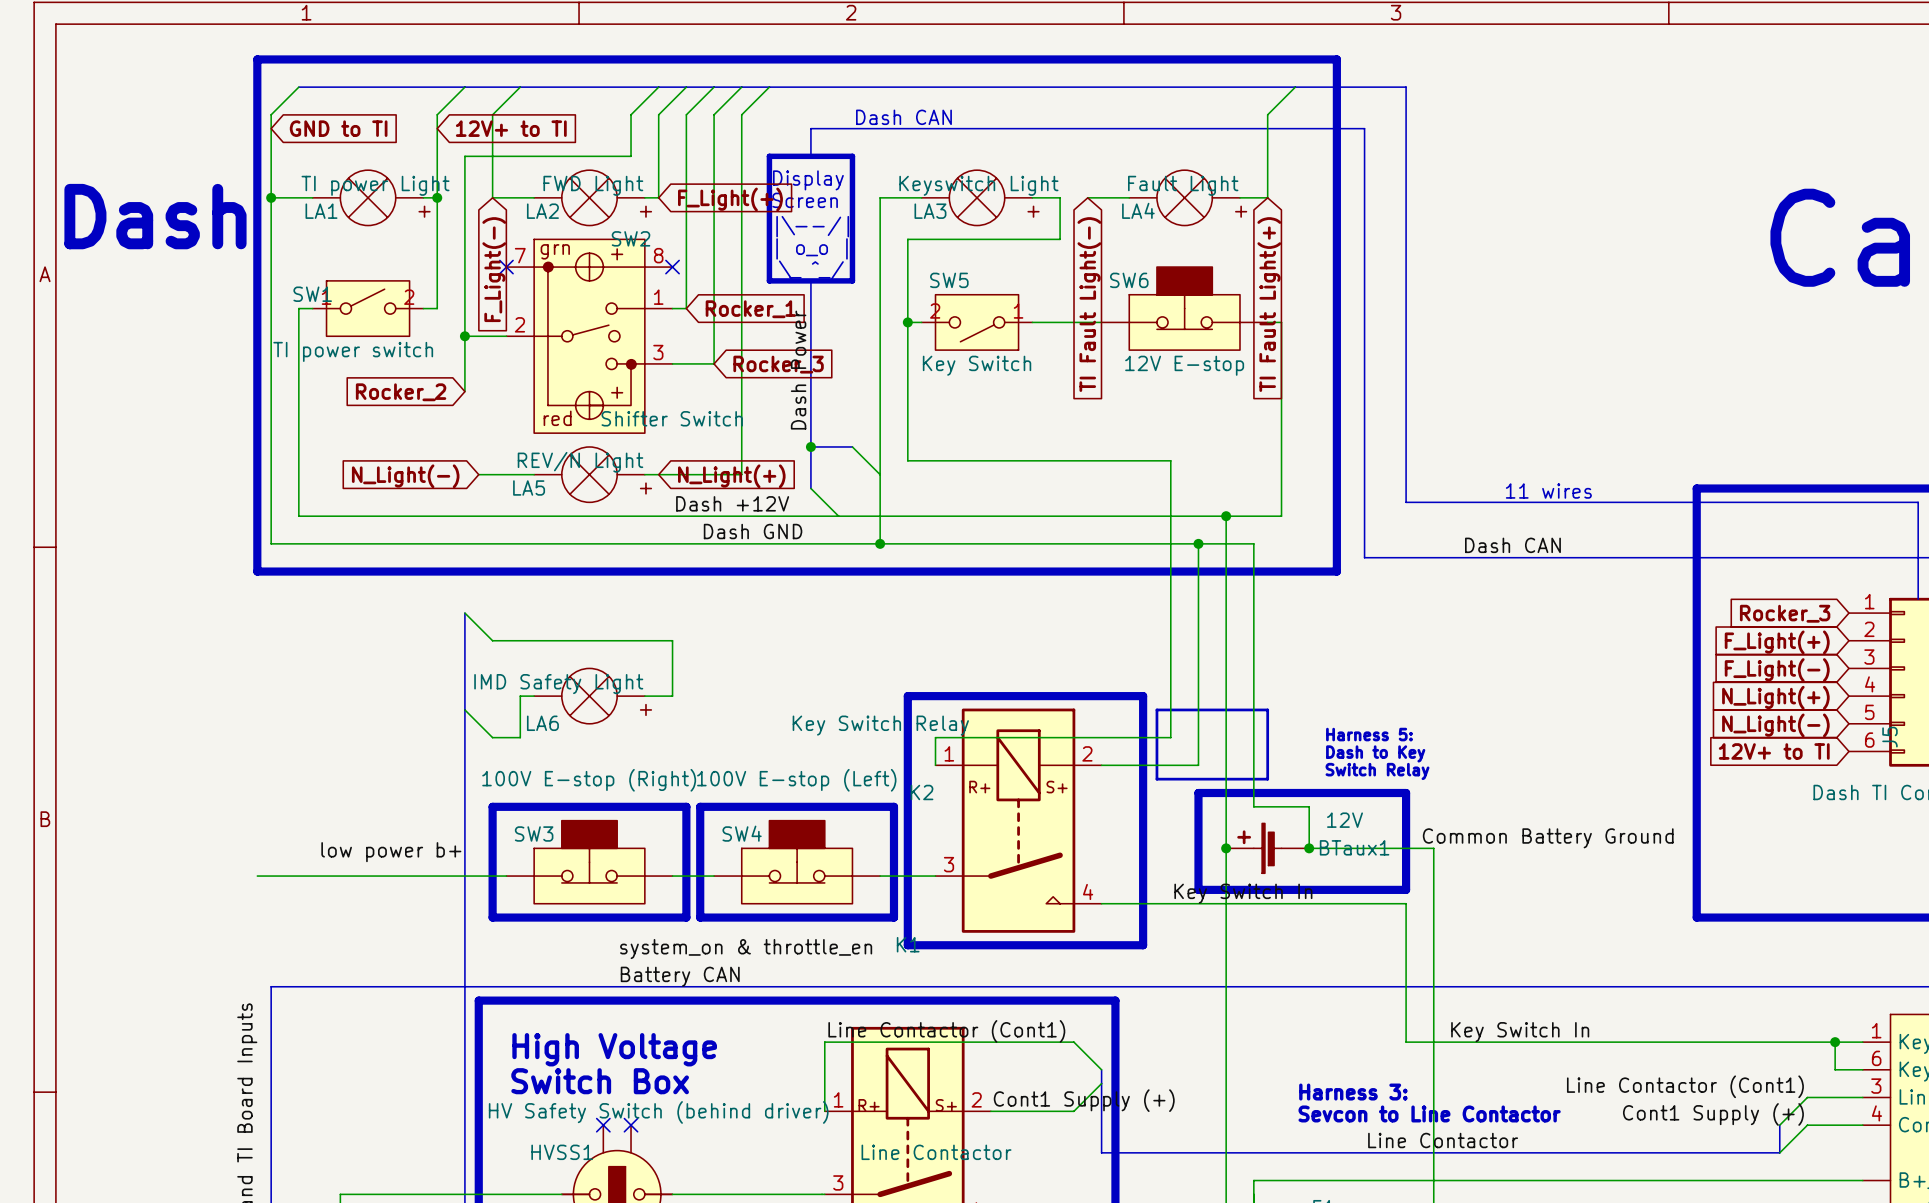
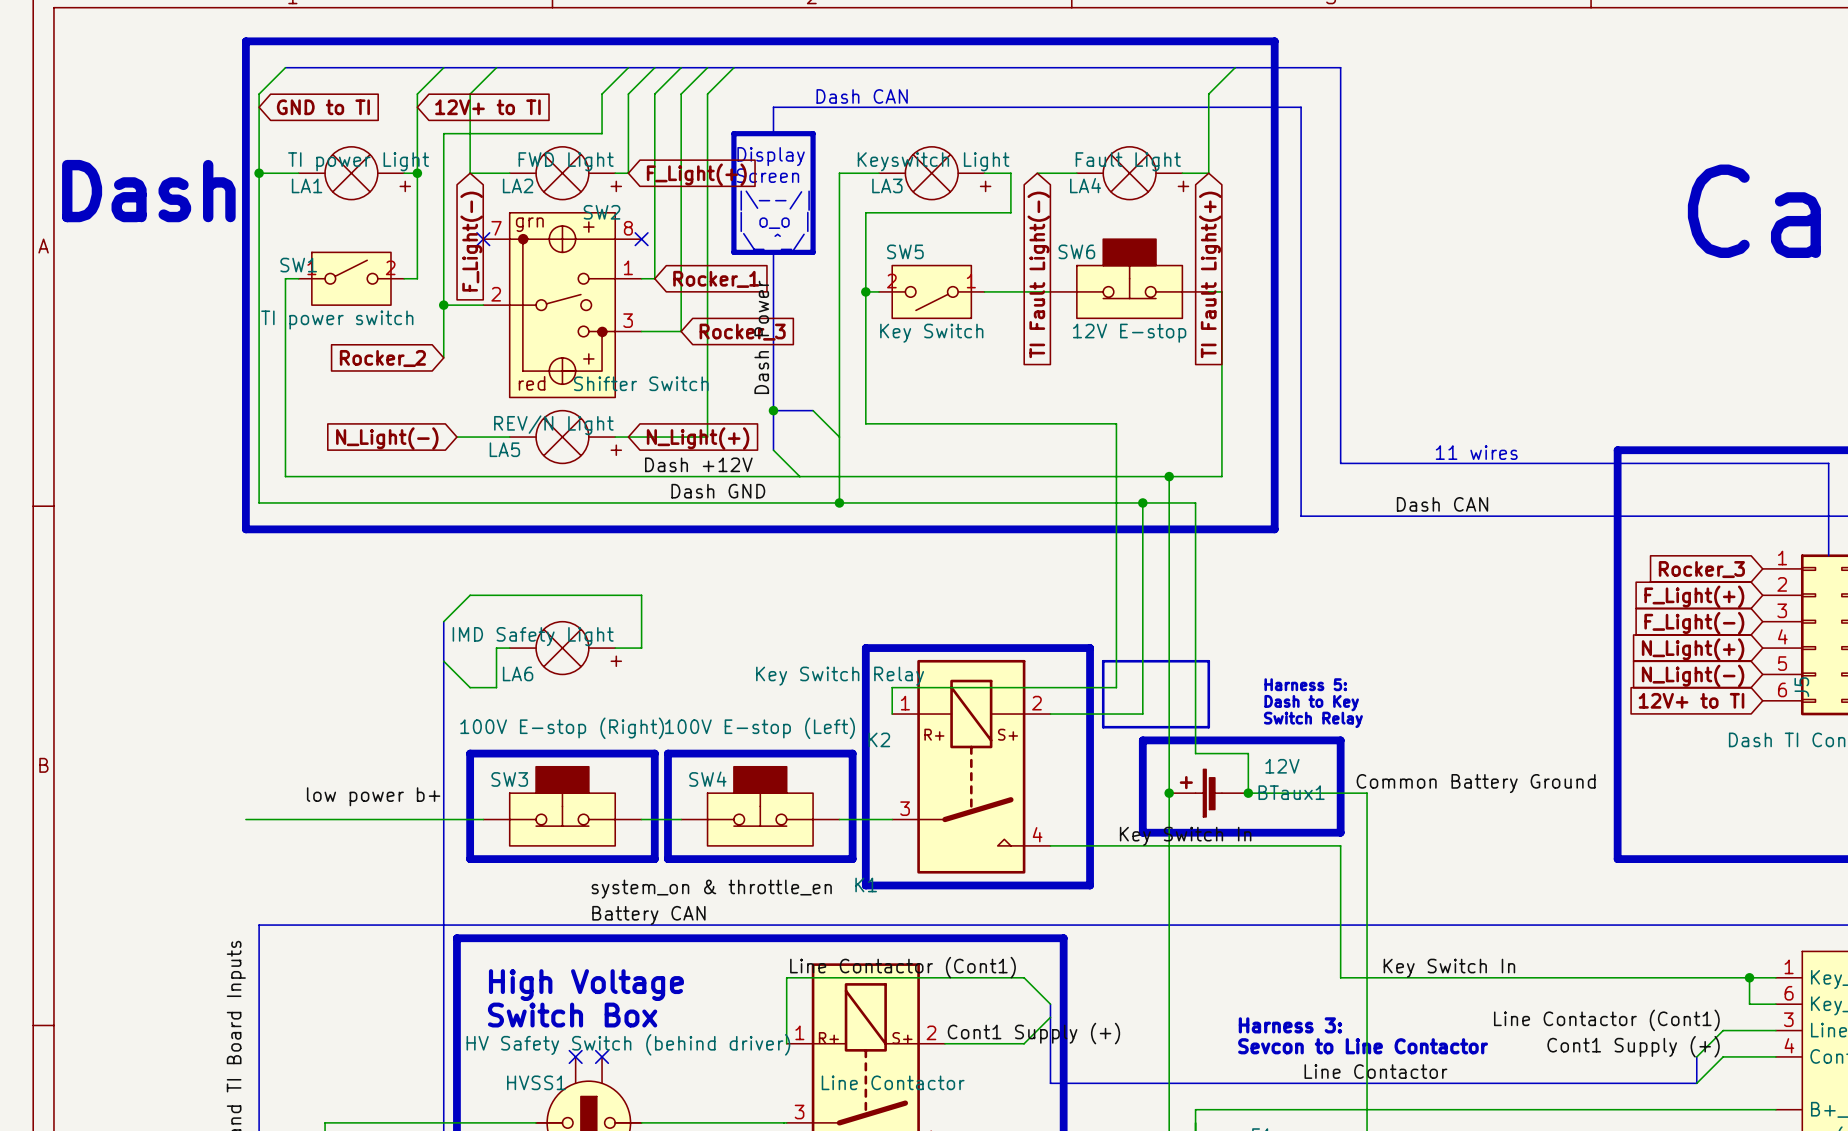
wire: (464, 613) (492, 640) -> (443, 621) (470, 595)
bus: (464, 613) (464, 668) -> none

